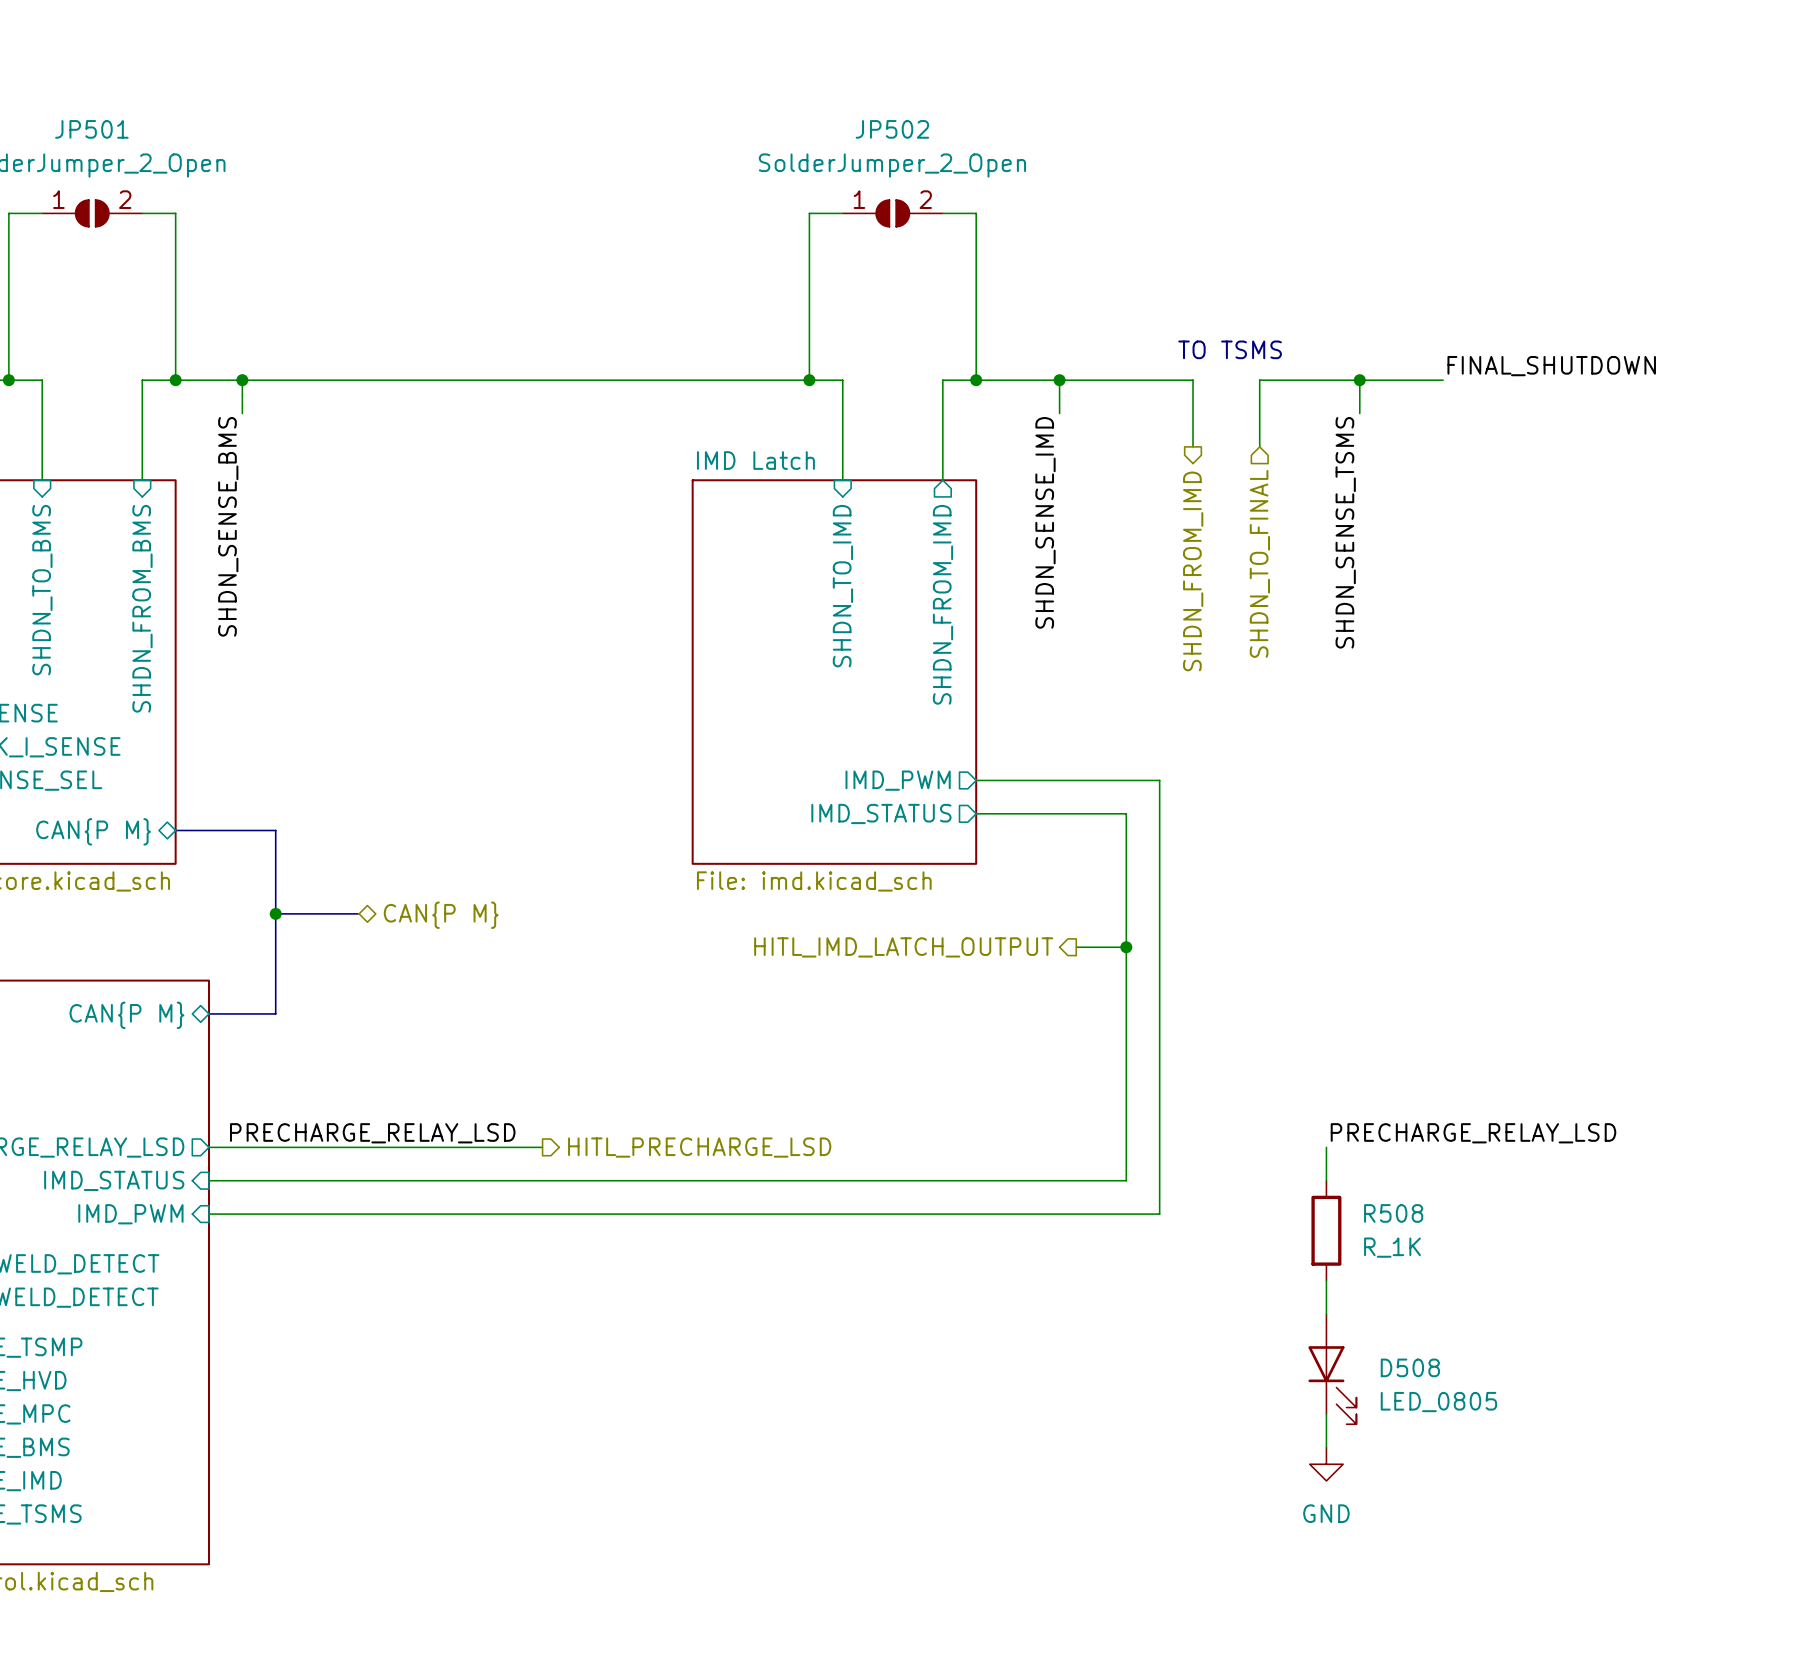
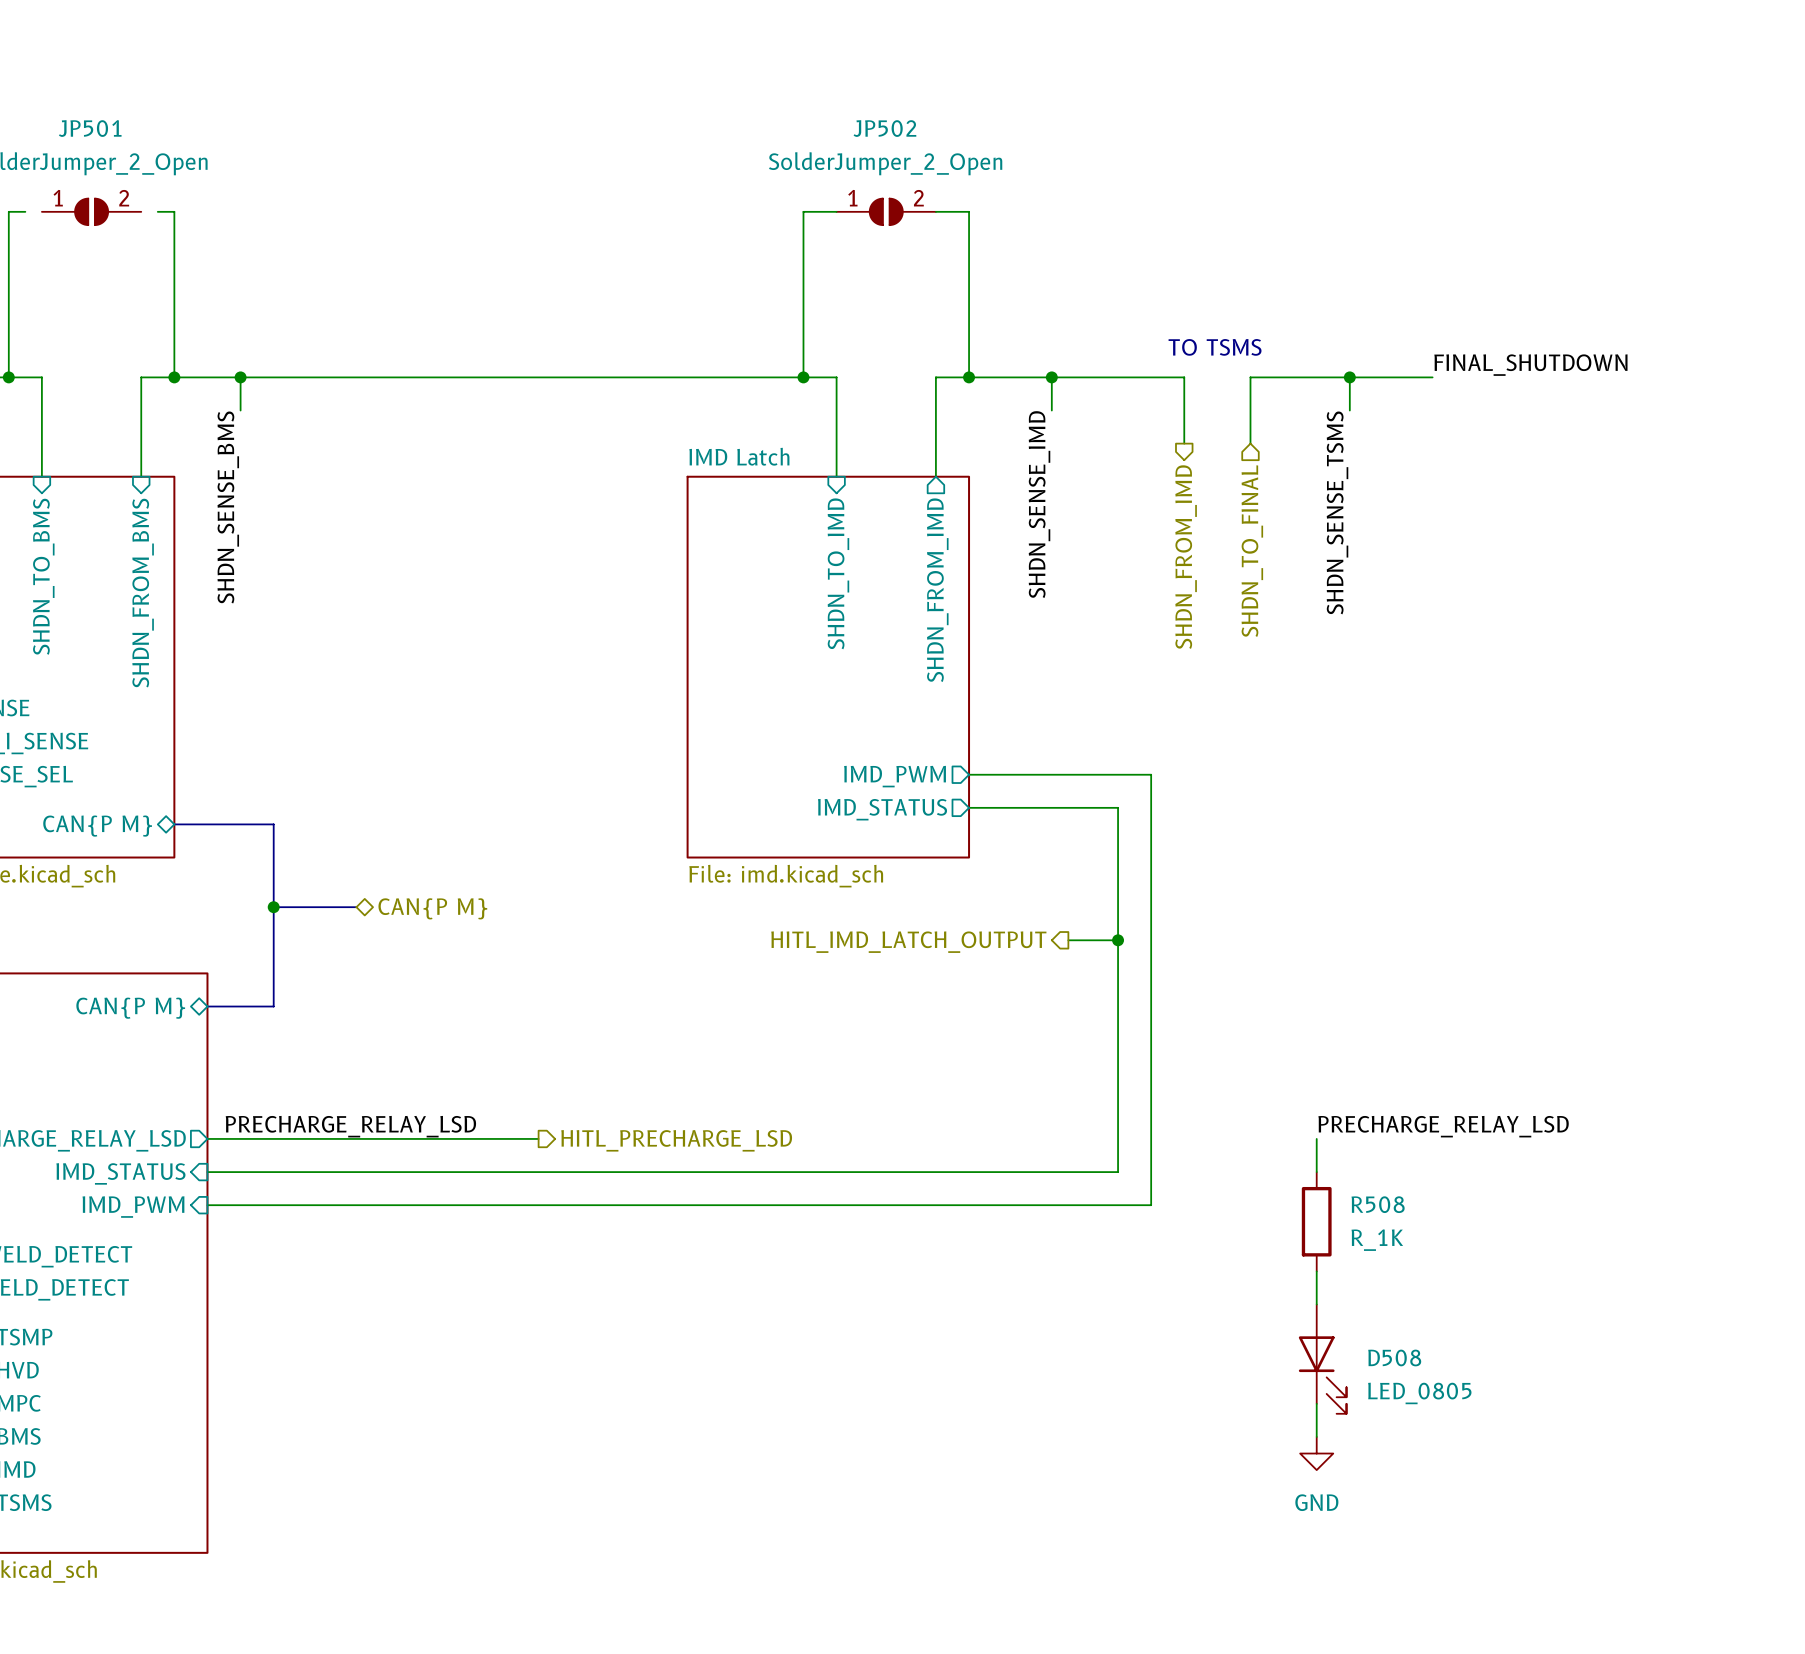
wire: (25, 213) (42, 213) -> none
wire: (142, 213) (158, 213) -> none

